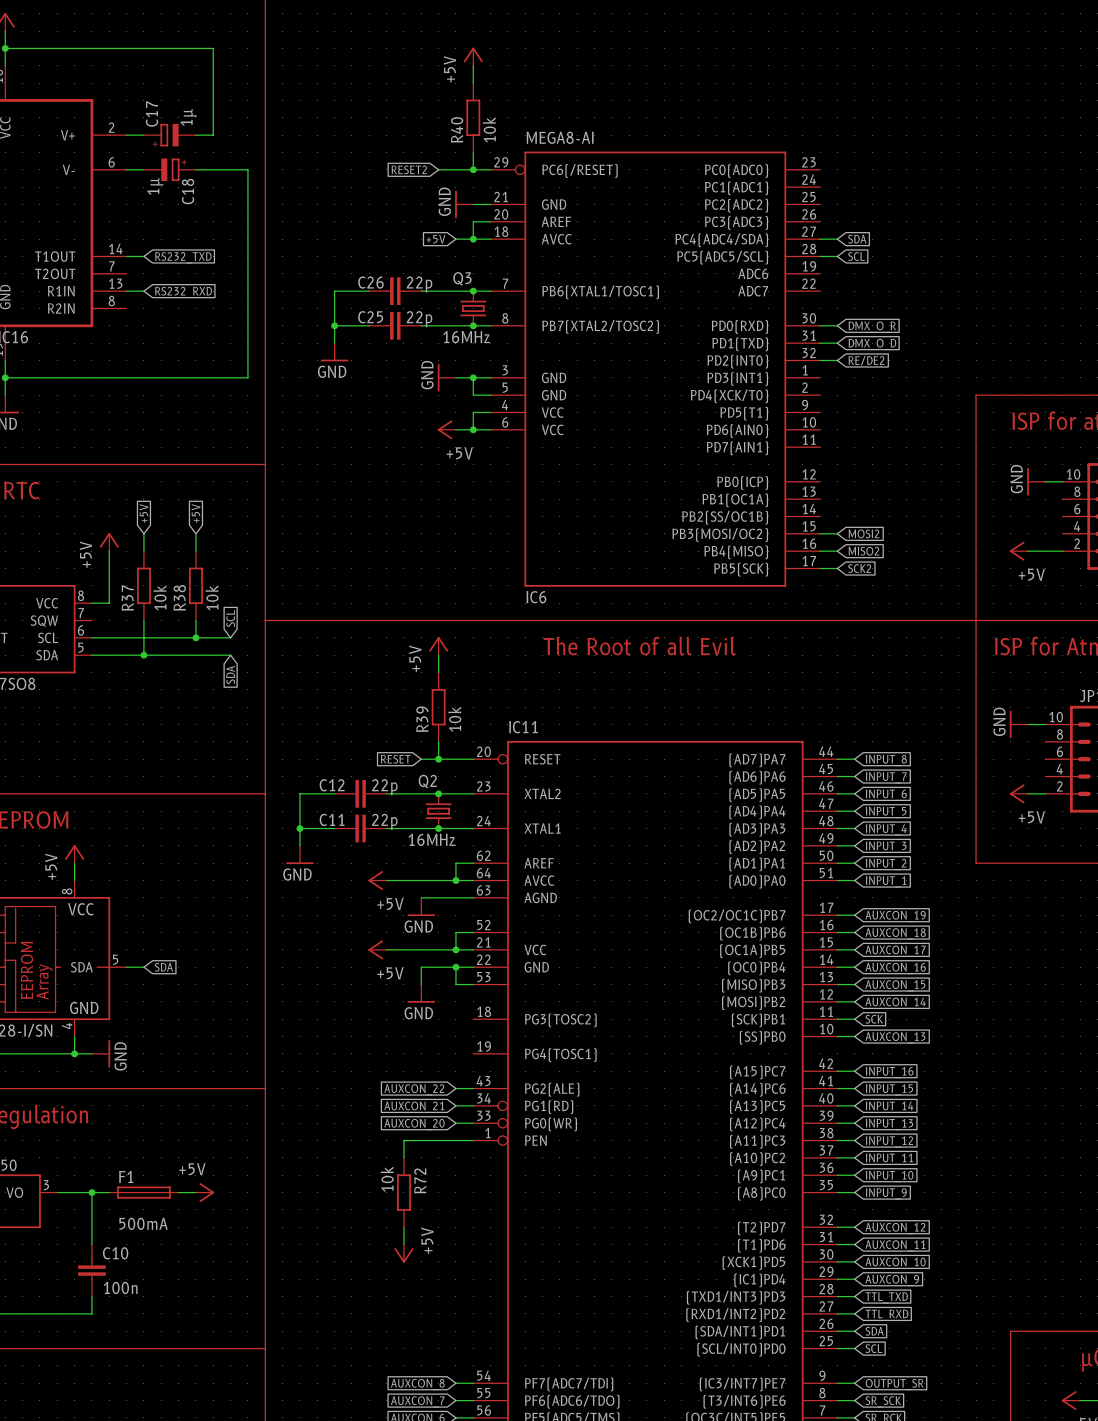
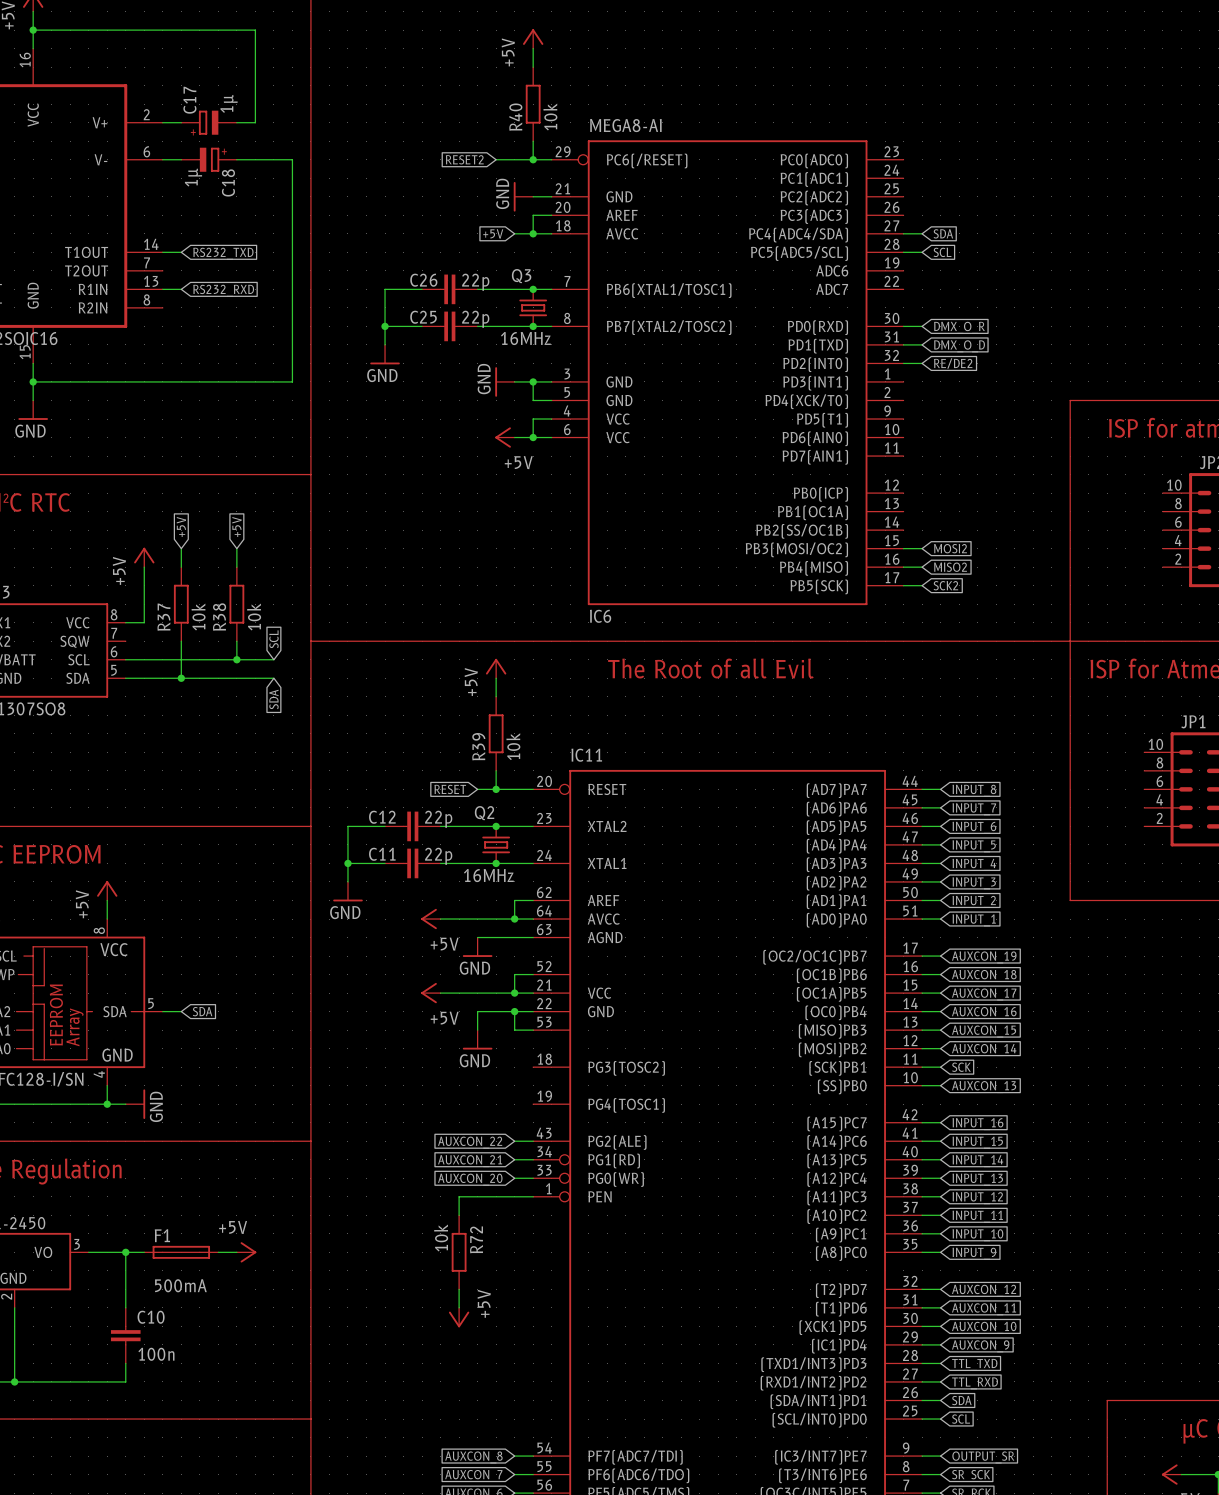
power symbol: GND (1036, 481) -> none
wire: (1045, 481) (1062, 481) -> none
power symbol: +5V (1018, 551) -> none
wire: (1028, 551) (1062, 551) -> none
power symbol: GND (1018, 724) -> none
wire: (1028, 724) (1045, 724) -> none
power symbol: +5V (1018, 793) -> none
wire: (1028, 793) (1045, 793) -> none

